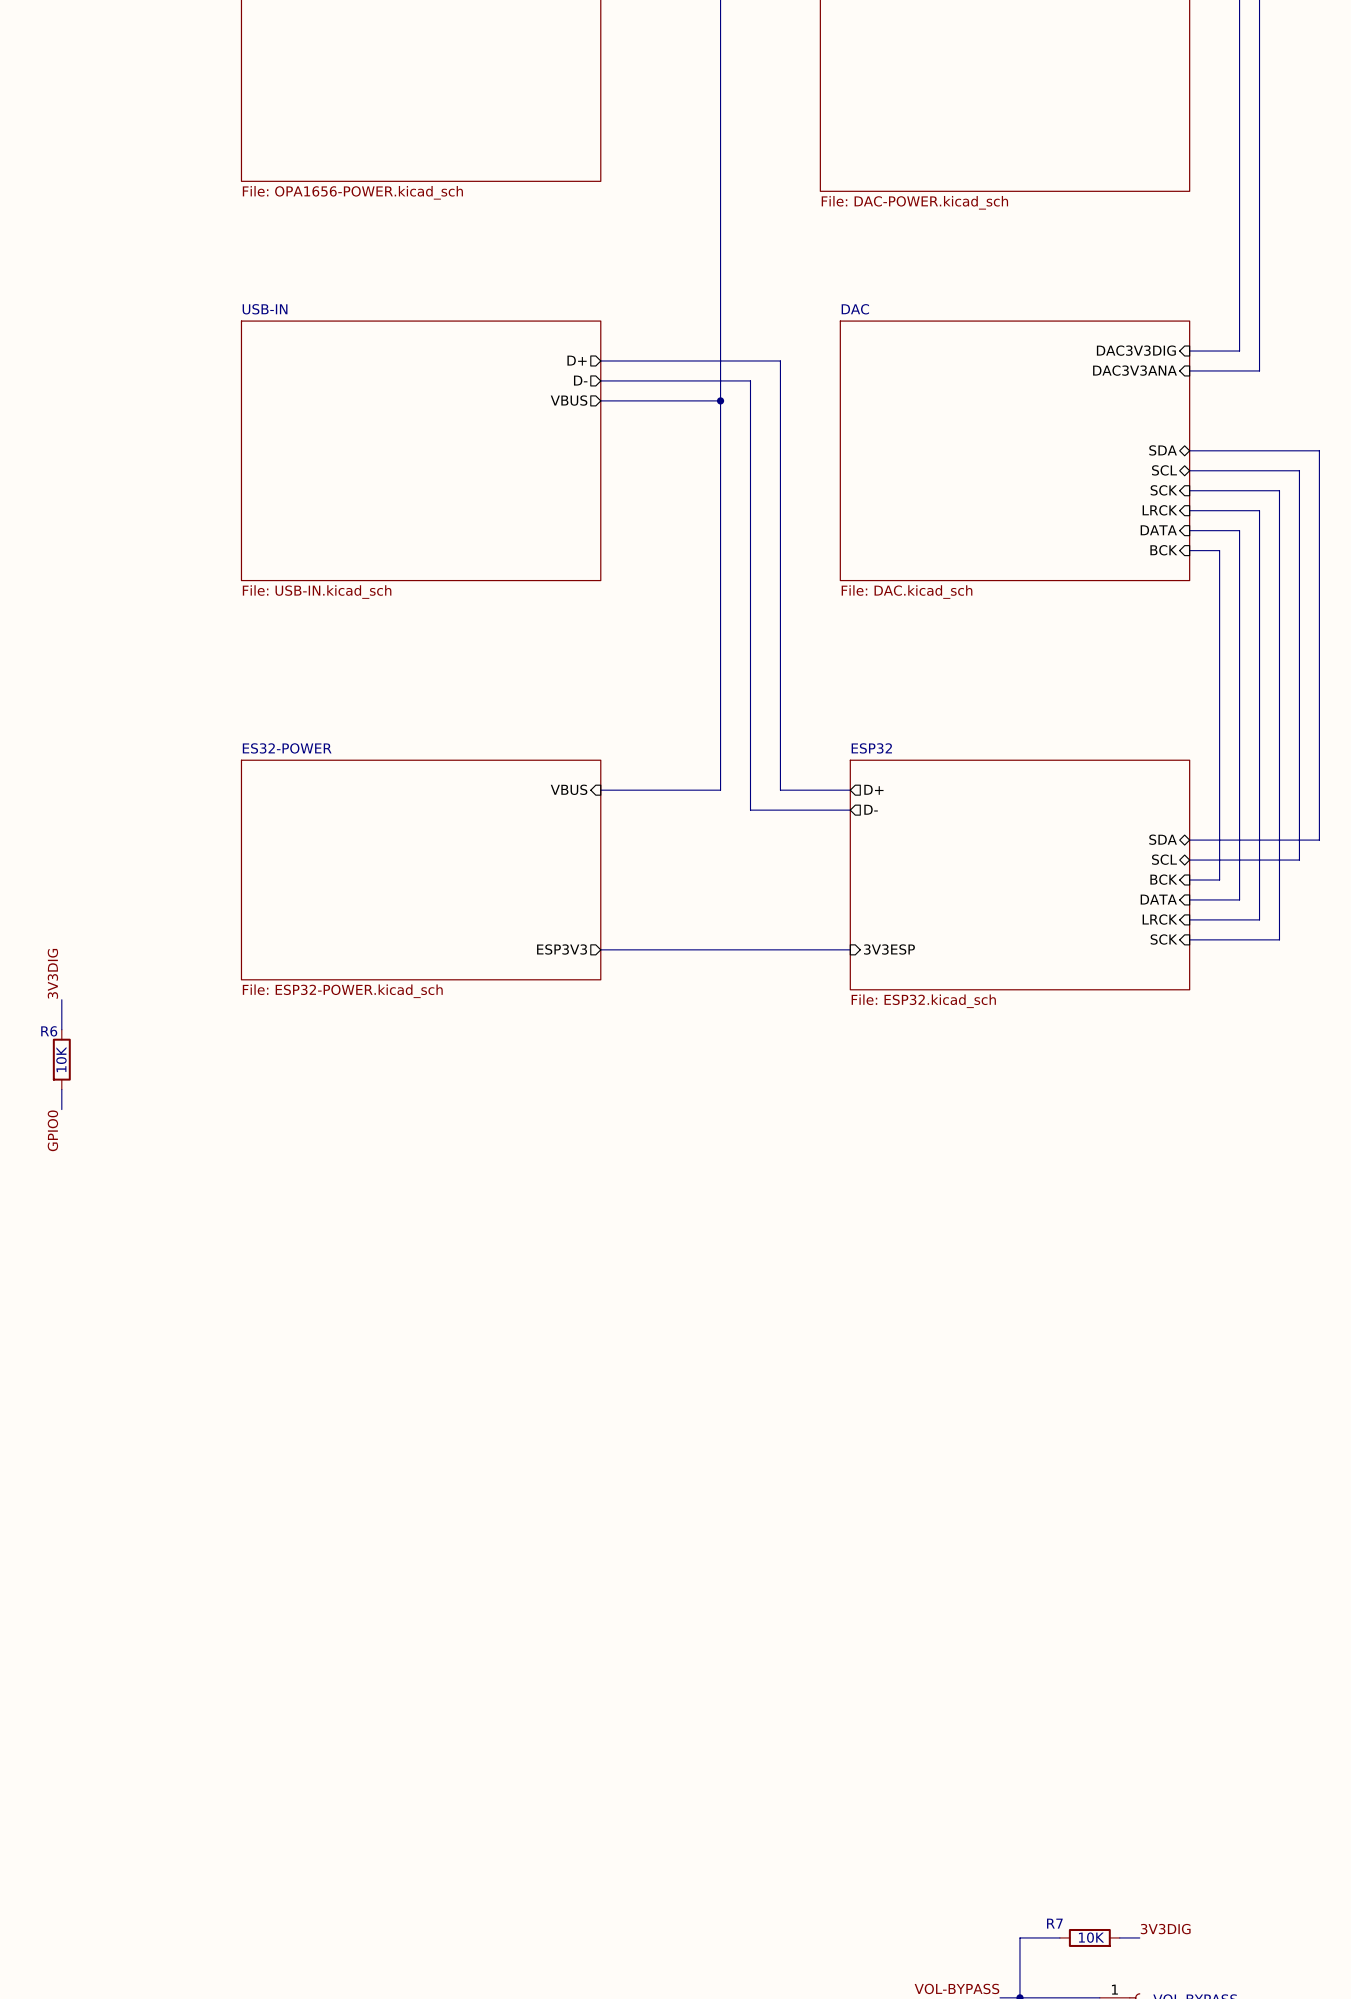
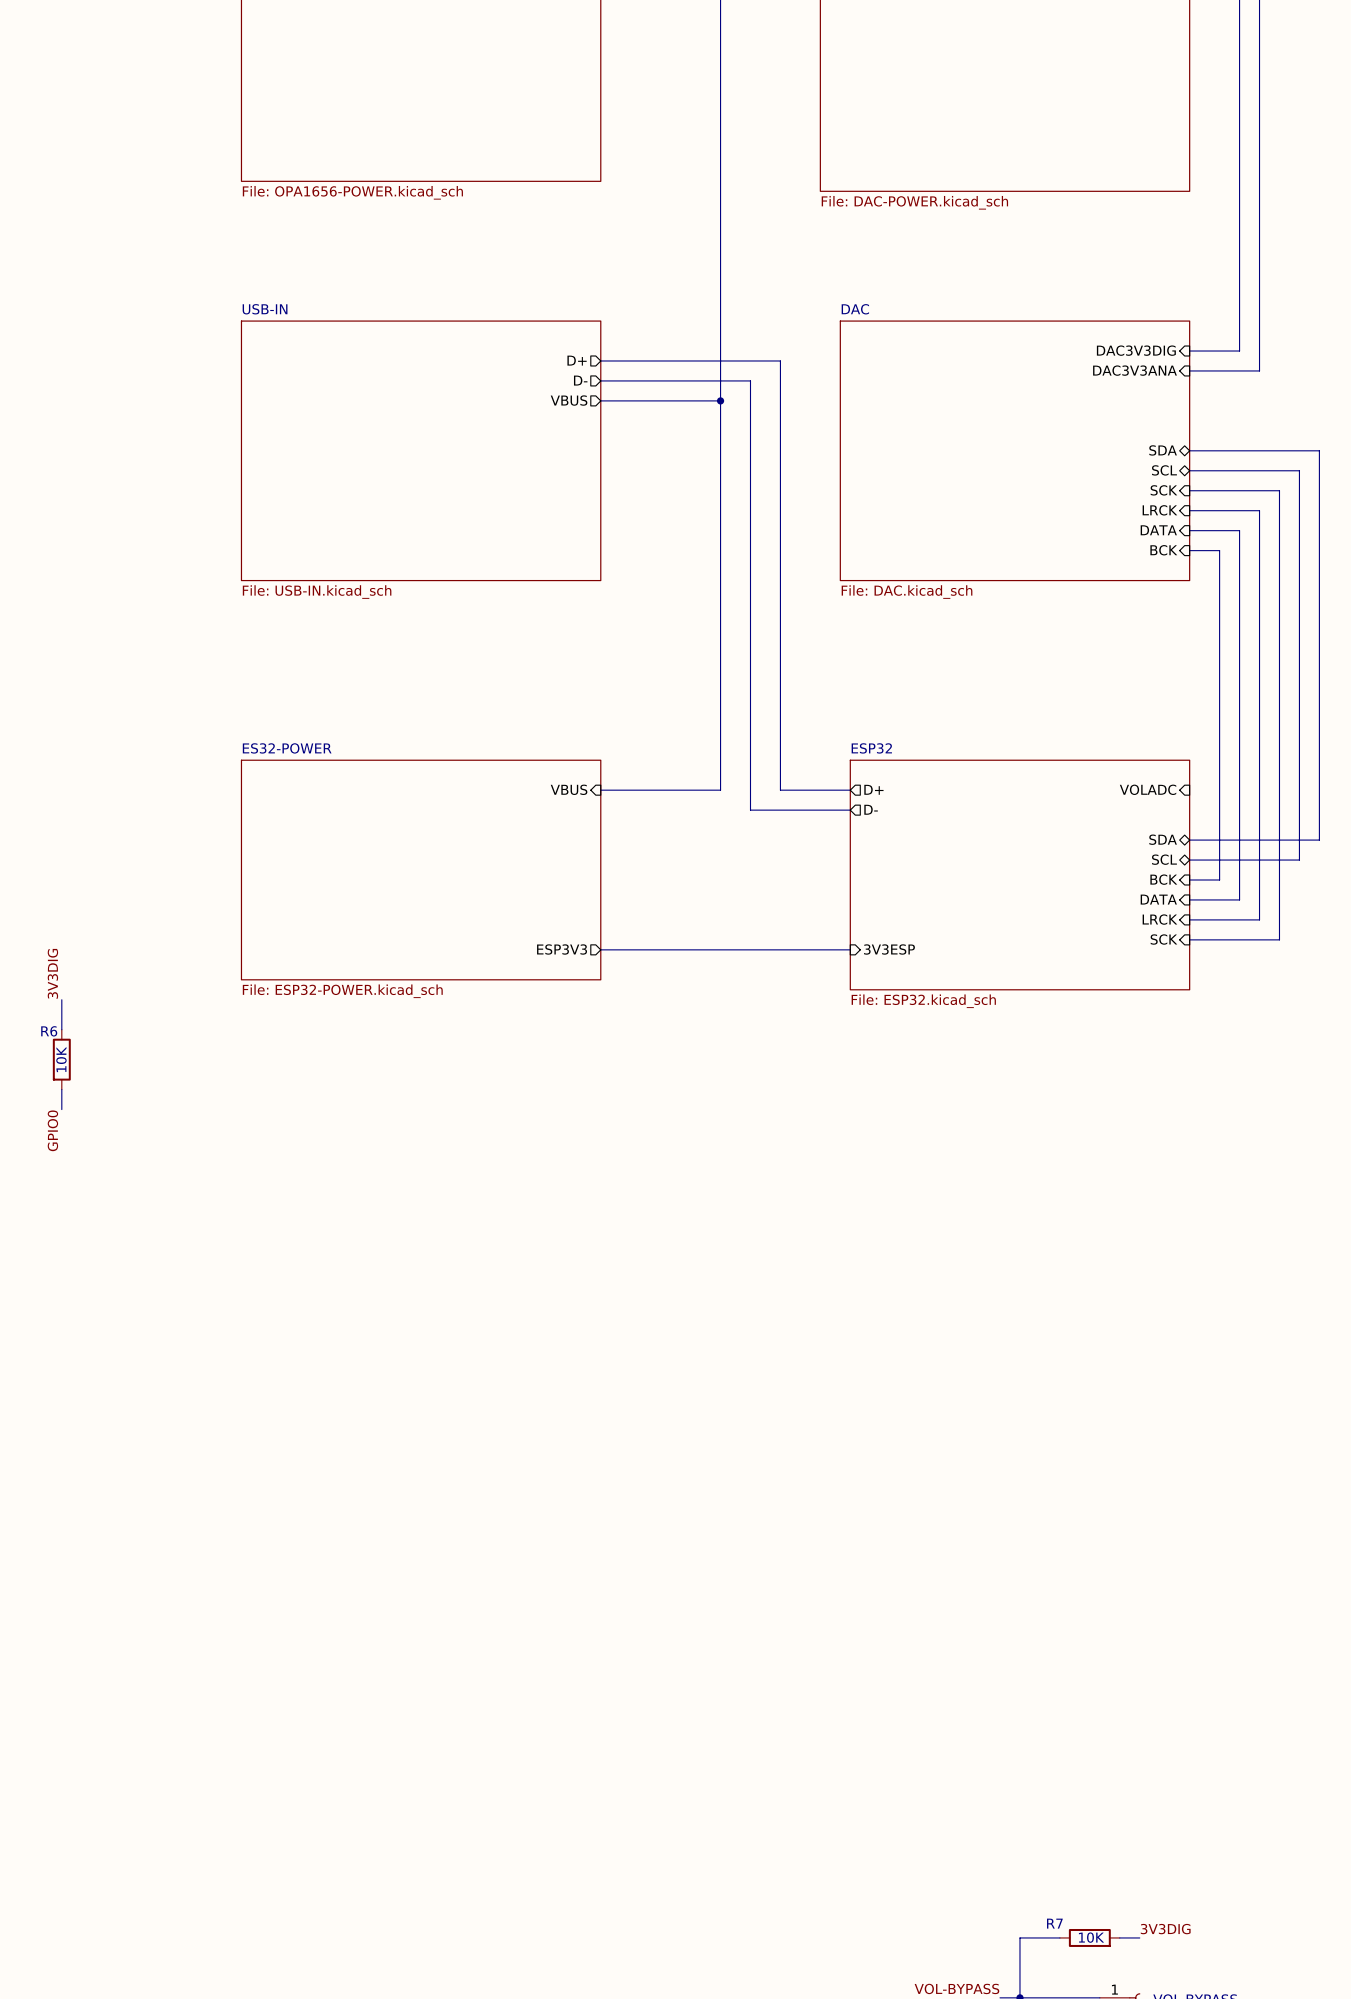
sheet pin: none -> VOLADC (1148, 789)

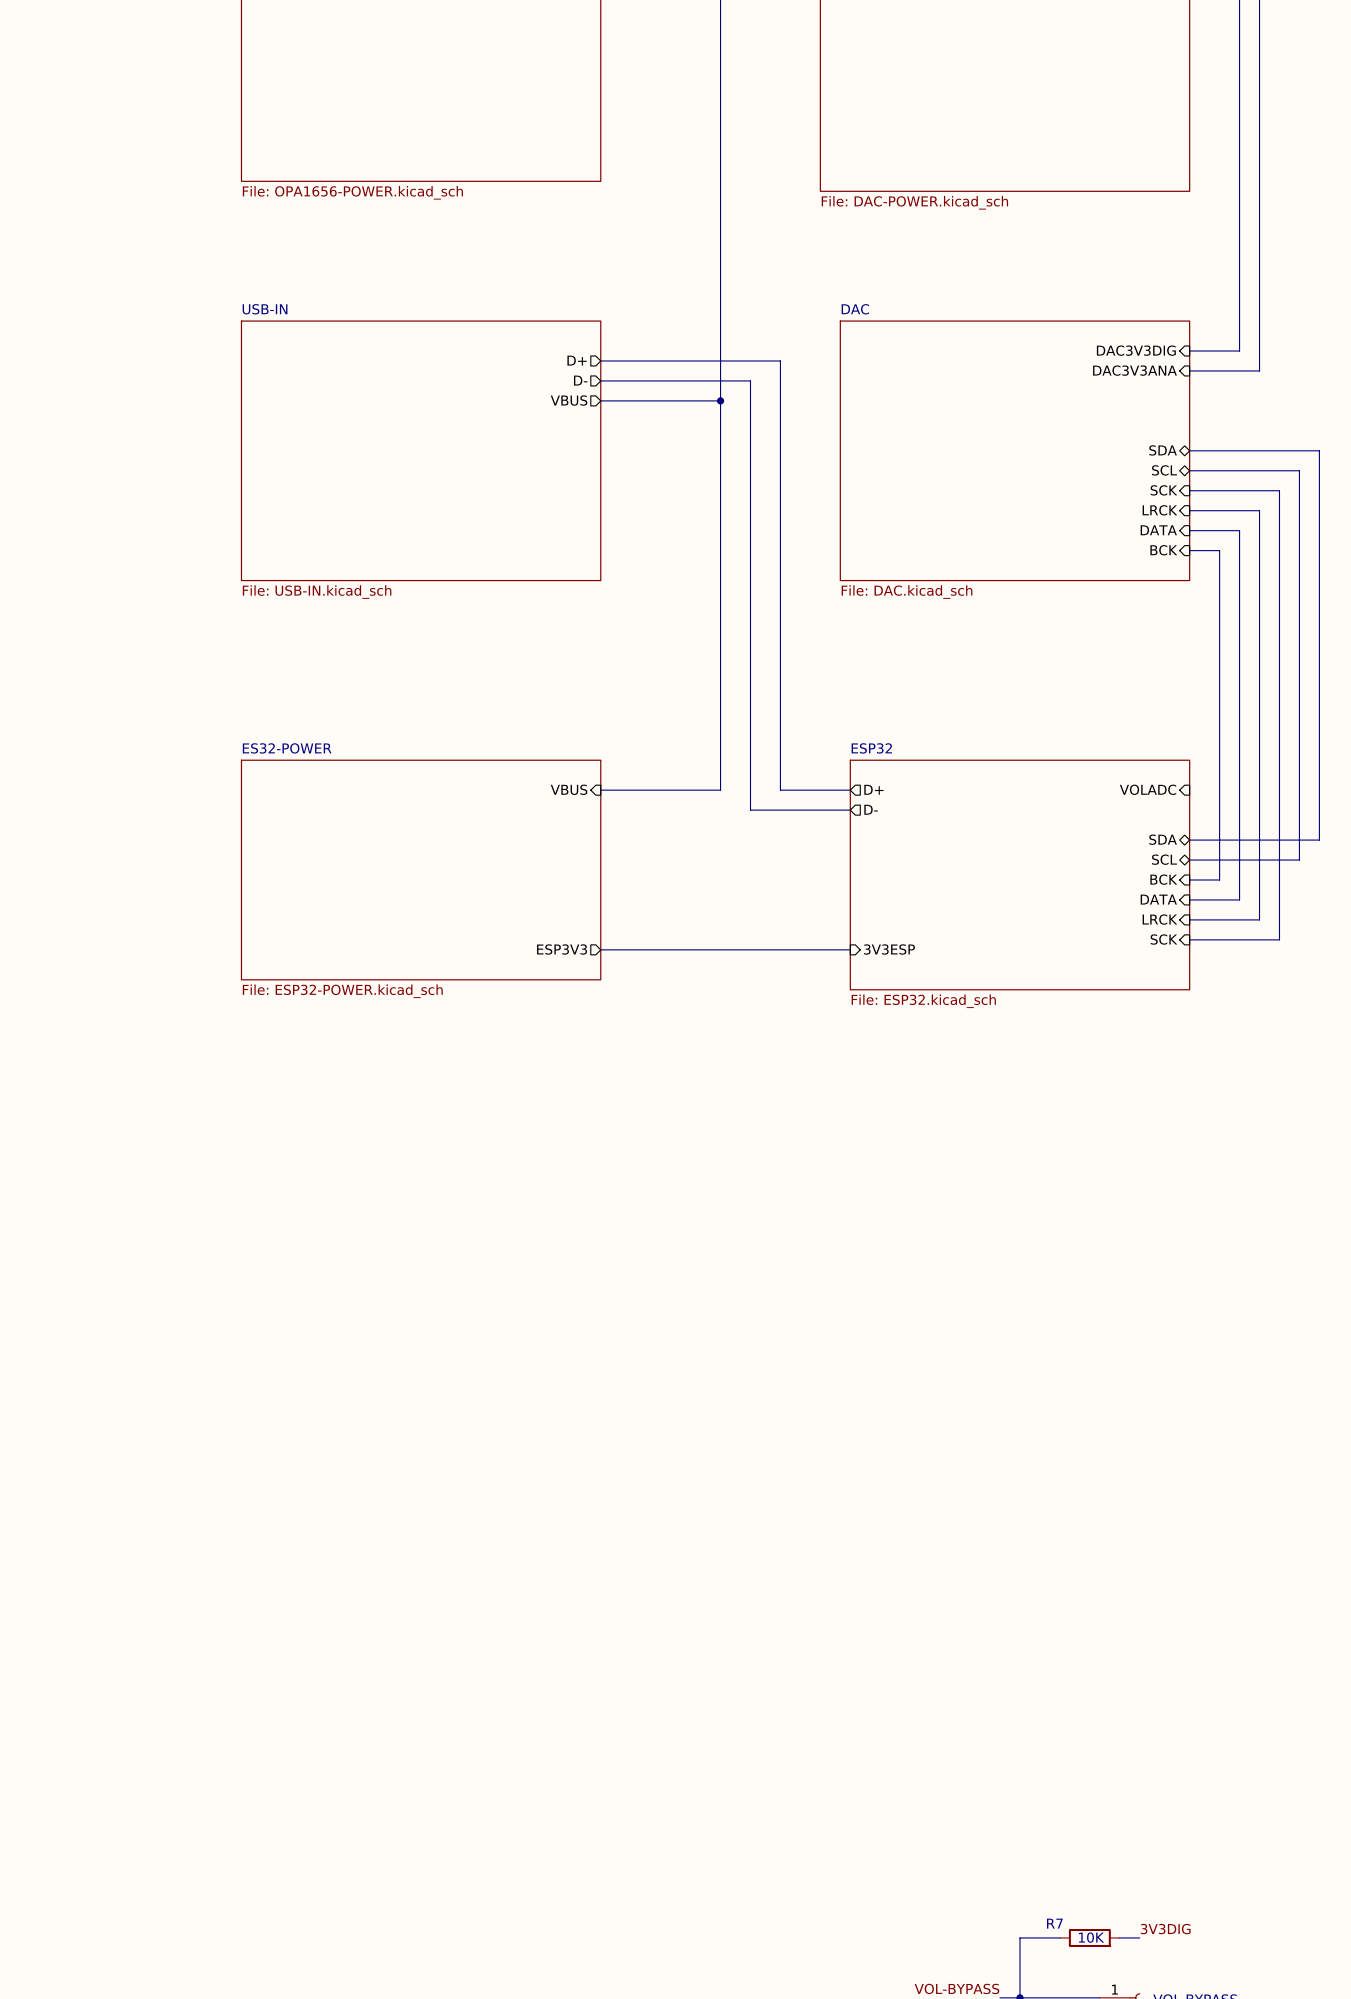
label: 3V3DIG (52, 973) -> none
wire: (61, 999) (61, 1029) -> none
R6: 10K (61, 1059) -> none
wire: (61, 1089) (61, 1109) -> none
label: GPIO0 (52, 1130) -> none

